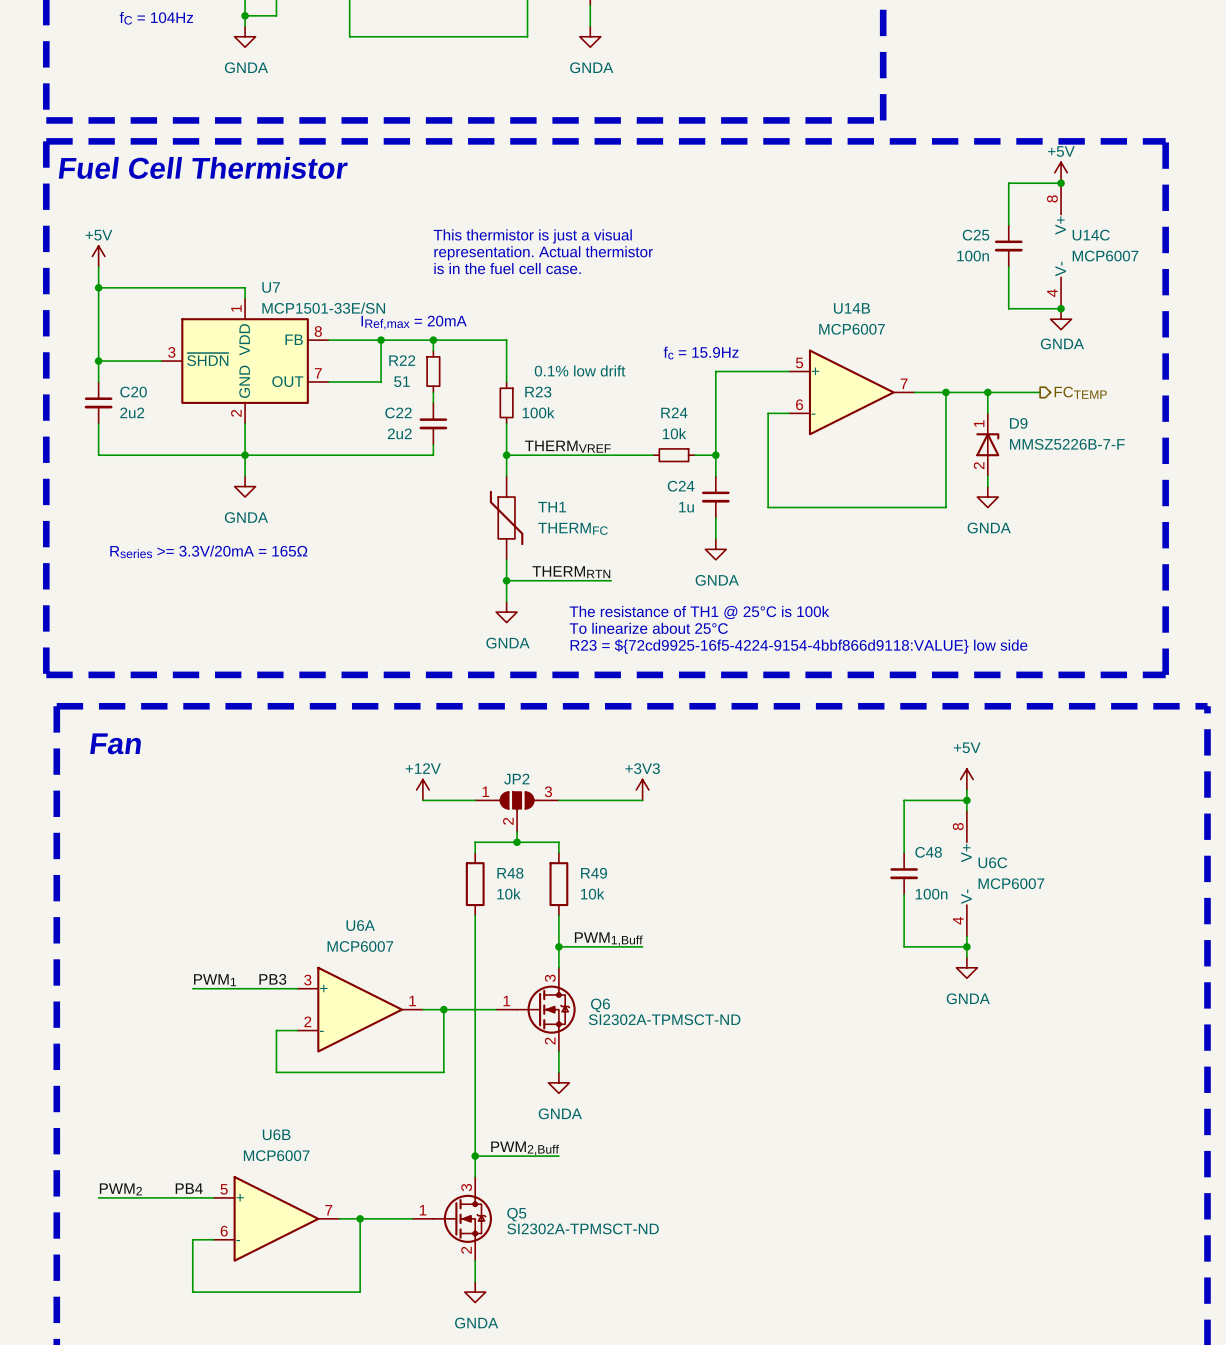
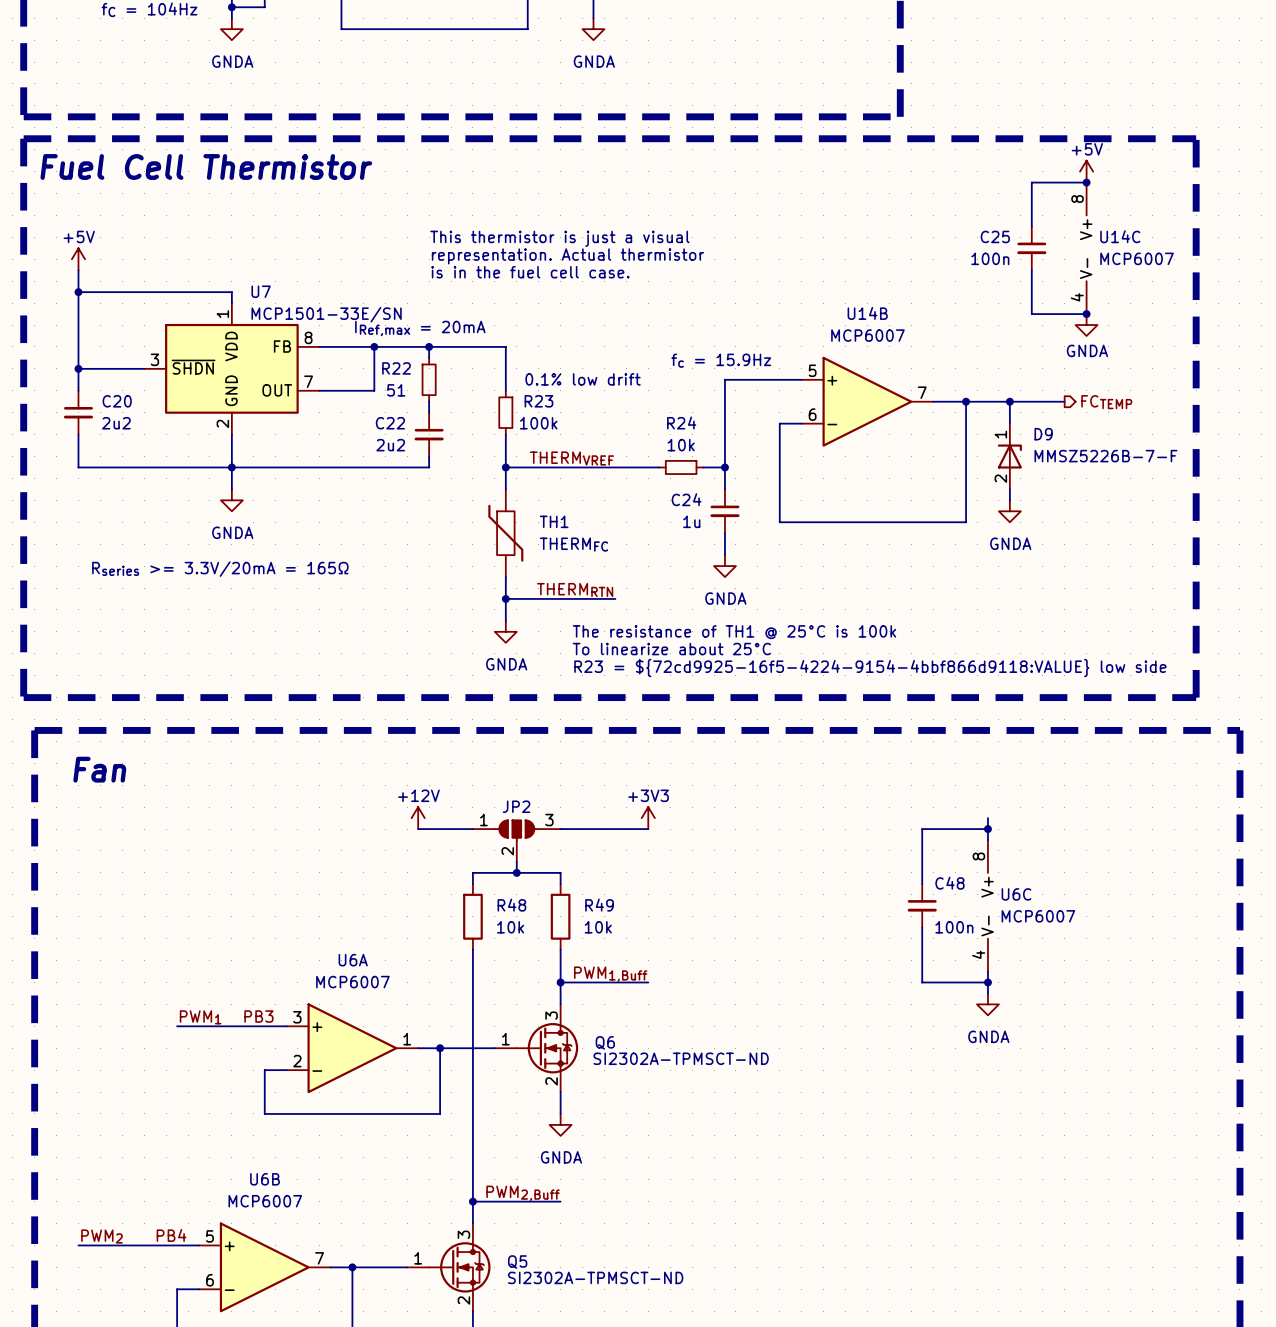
power symbol: +5V (966, 779) -> none

